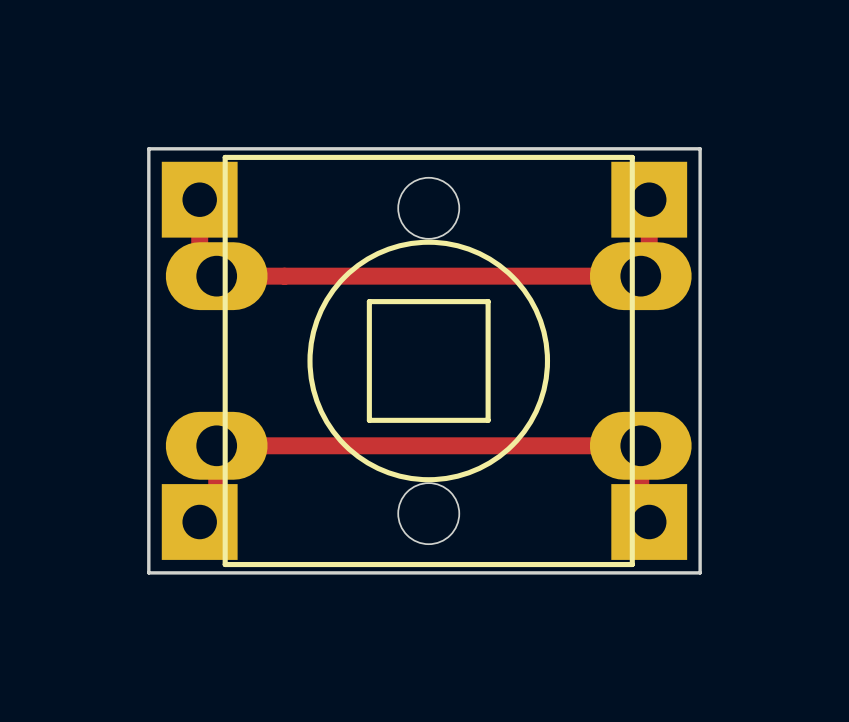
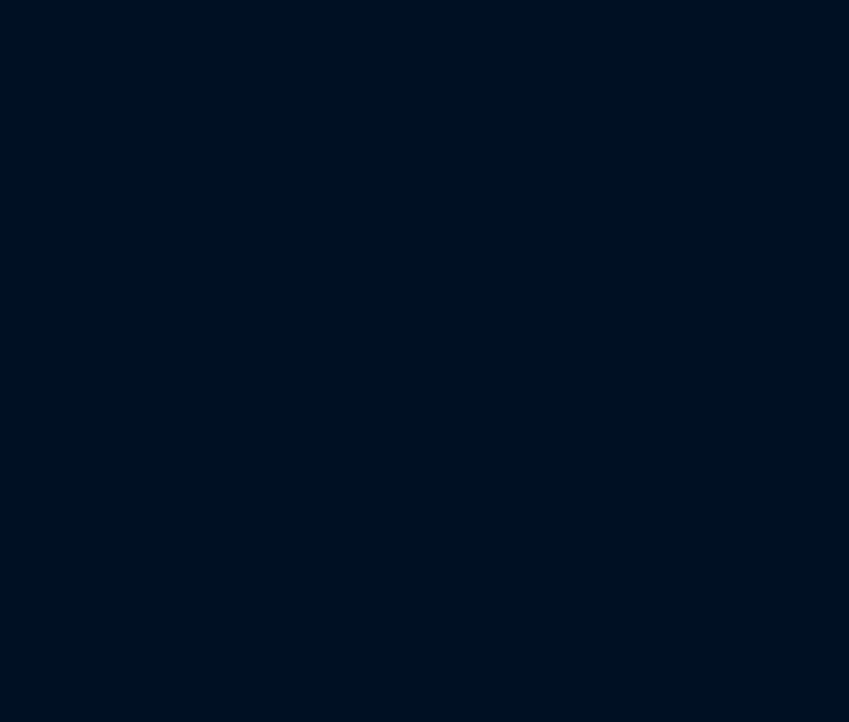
board edge: (148, 148) (148, 572) (700, 572) (700, 148) (148, 148) -> none
track: (199, 199) (199, 259) (216, 276) (640, 276) (649, 267) (649, 199) -> none
part: (199, 199) -> none
part: (649, 199) -> none
part: (428, 360) -> none
track: (199, 522) (216, 505) (216, 445) (640, 445) (640, 513) (649, 522) -> none
part: (199, 522) -> none
part: (649, 522) -> none

